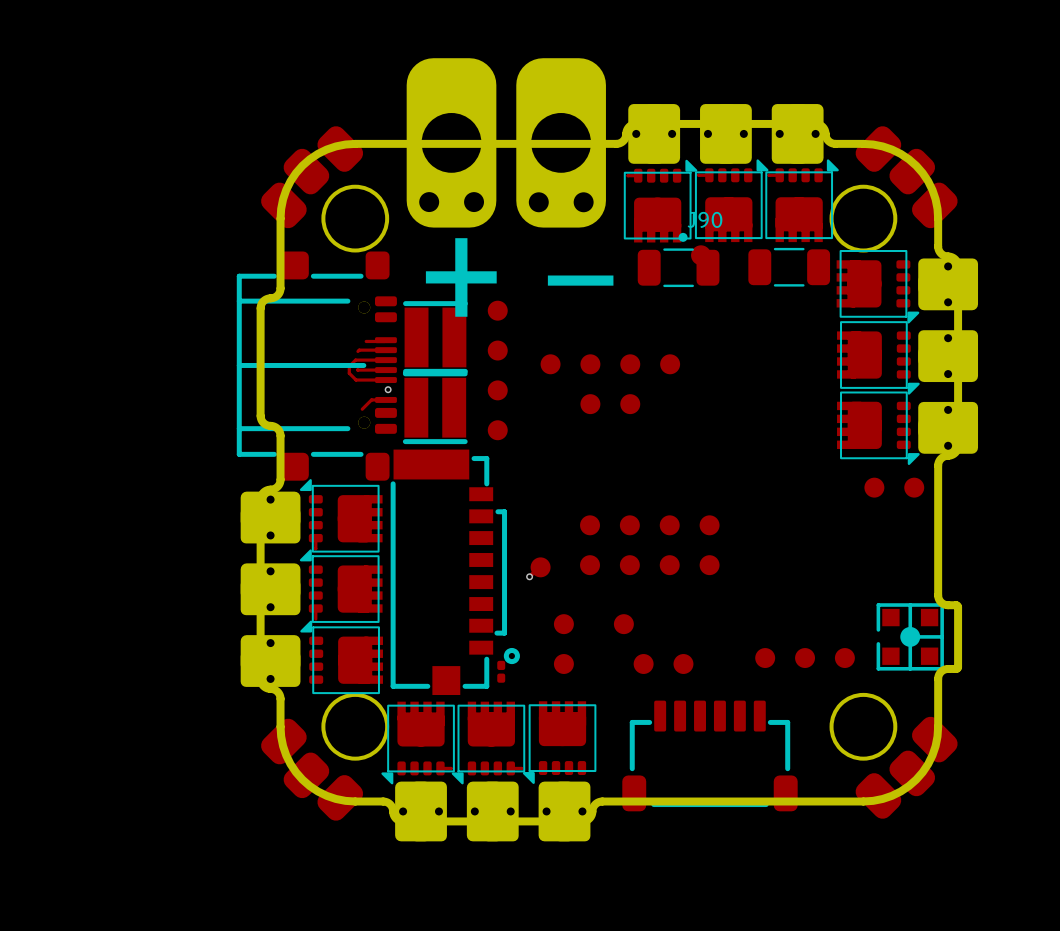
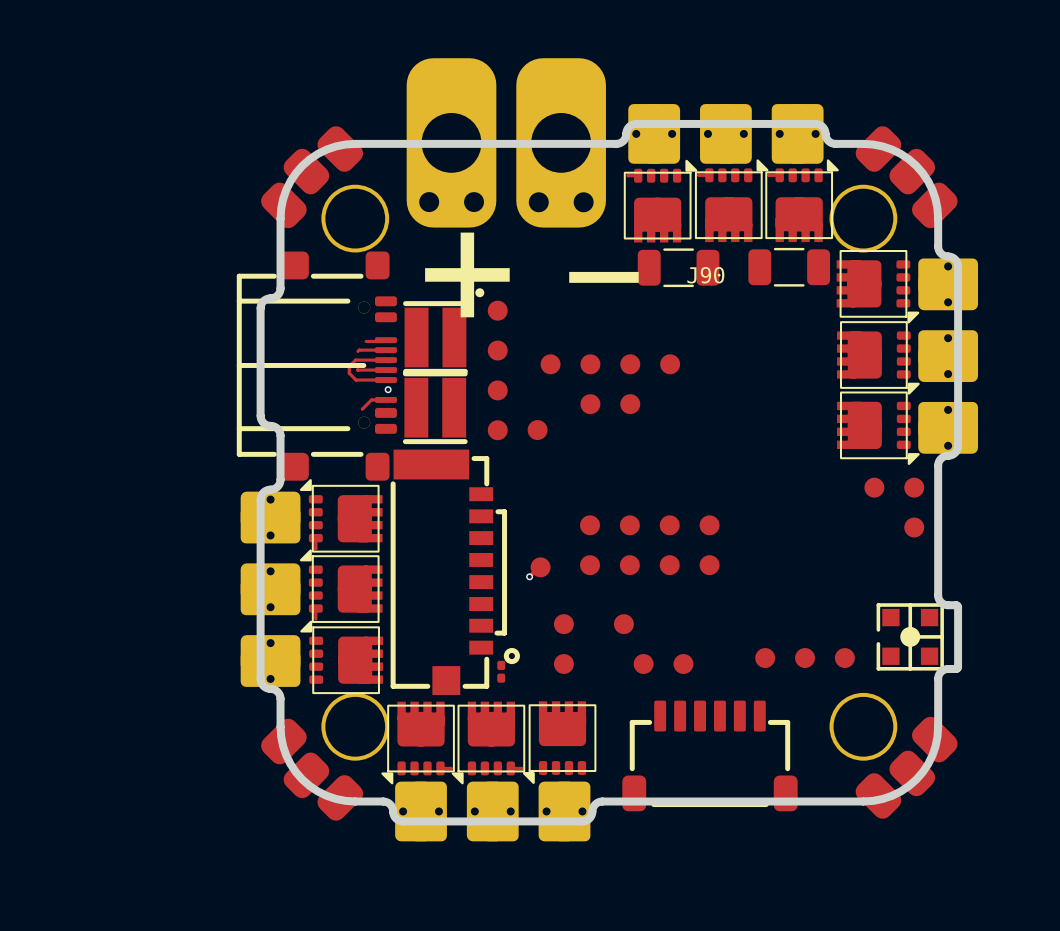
J90 footprint: [487, 232, 925, 674] -> [475, 288, 925, 674]

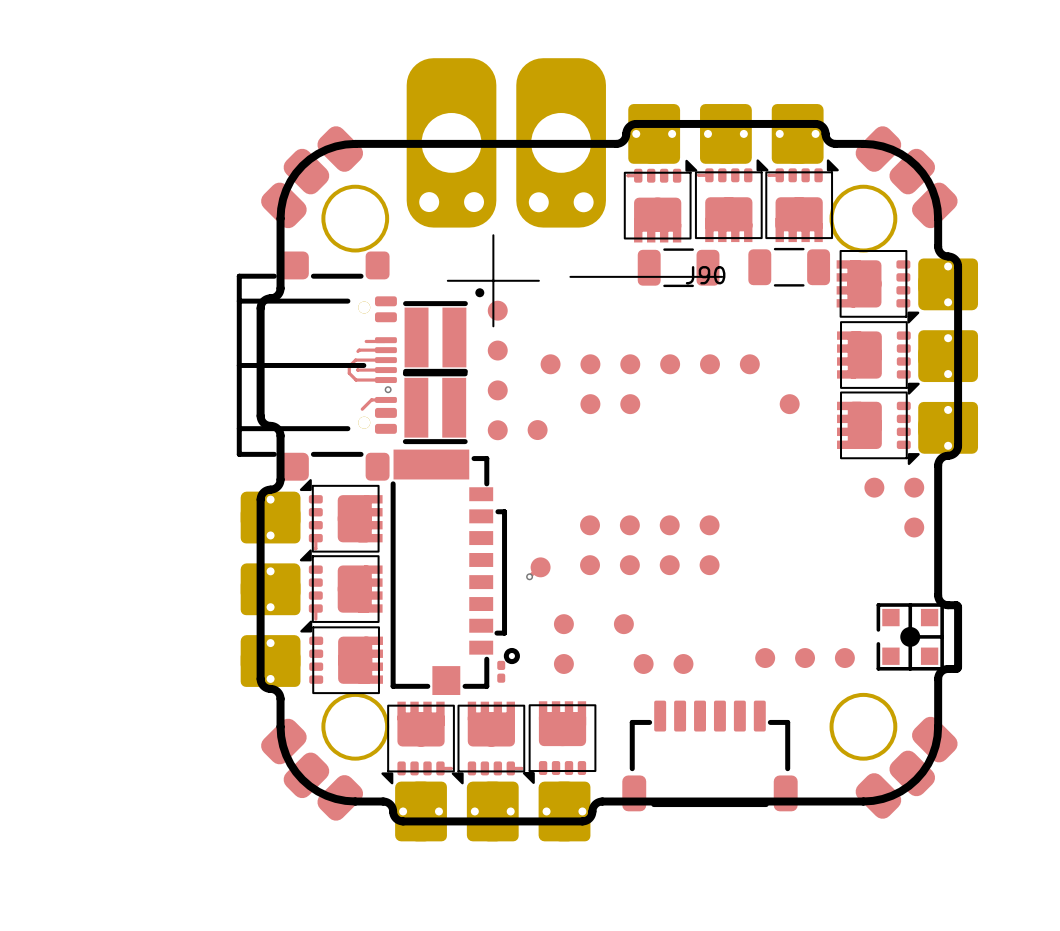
J90 footprint: [475, 288, 925, 674] -> [475, 288, 925, 674]

